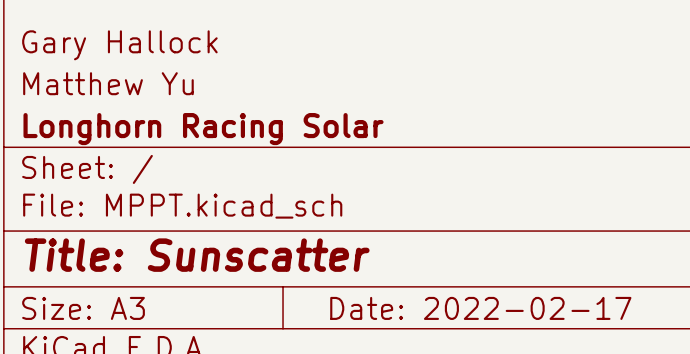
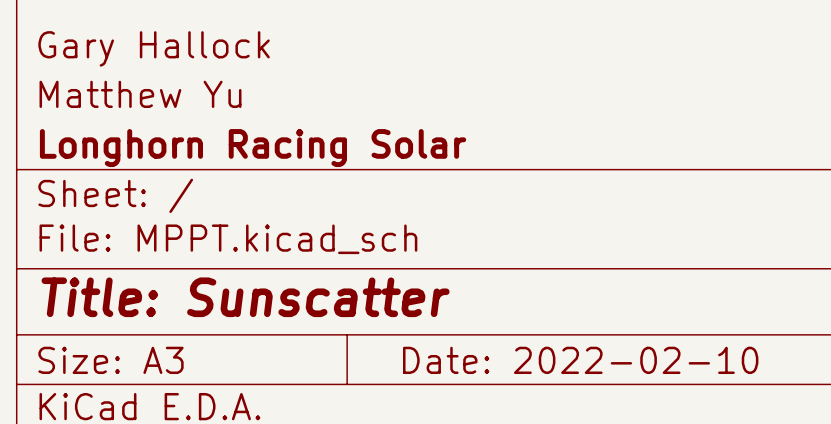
title block: Date: 2022-02-17 (480, 308) -> Date: 2022-02-10 (580, 360)

